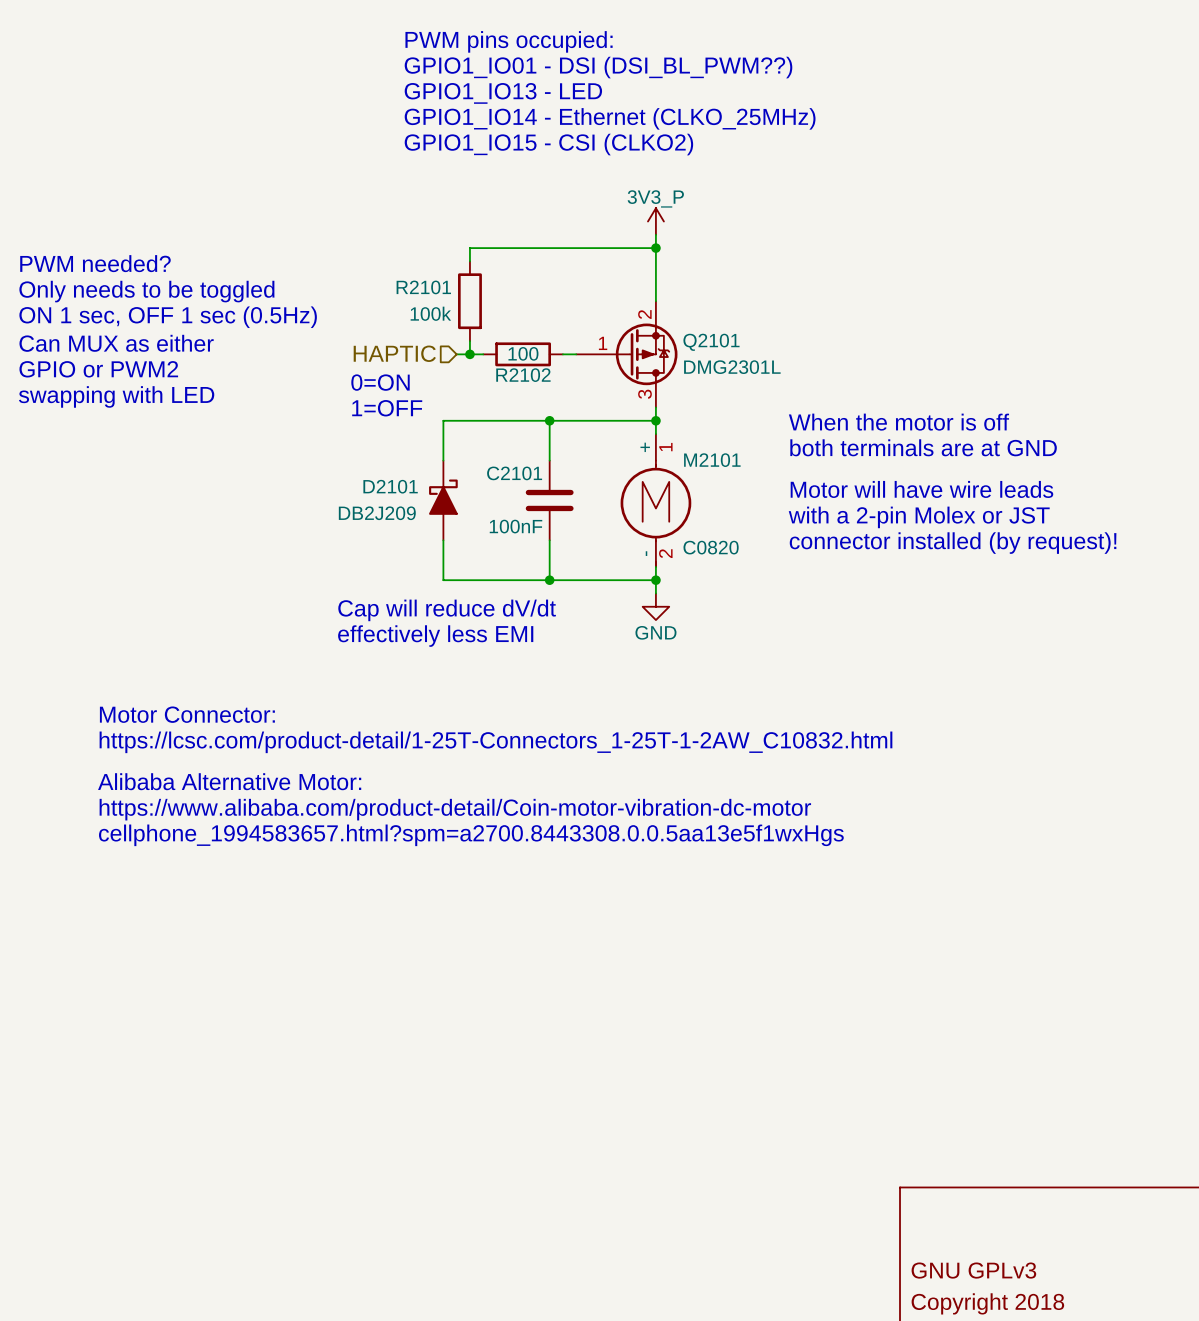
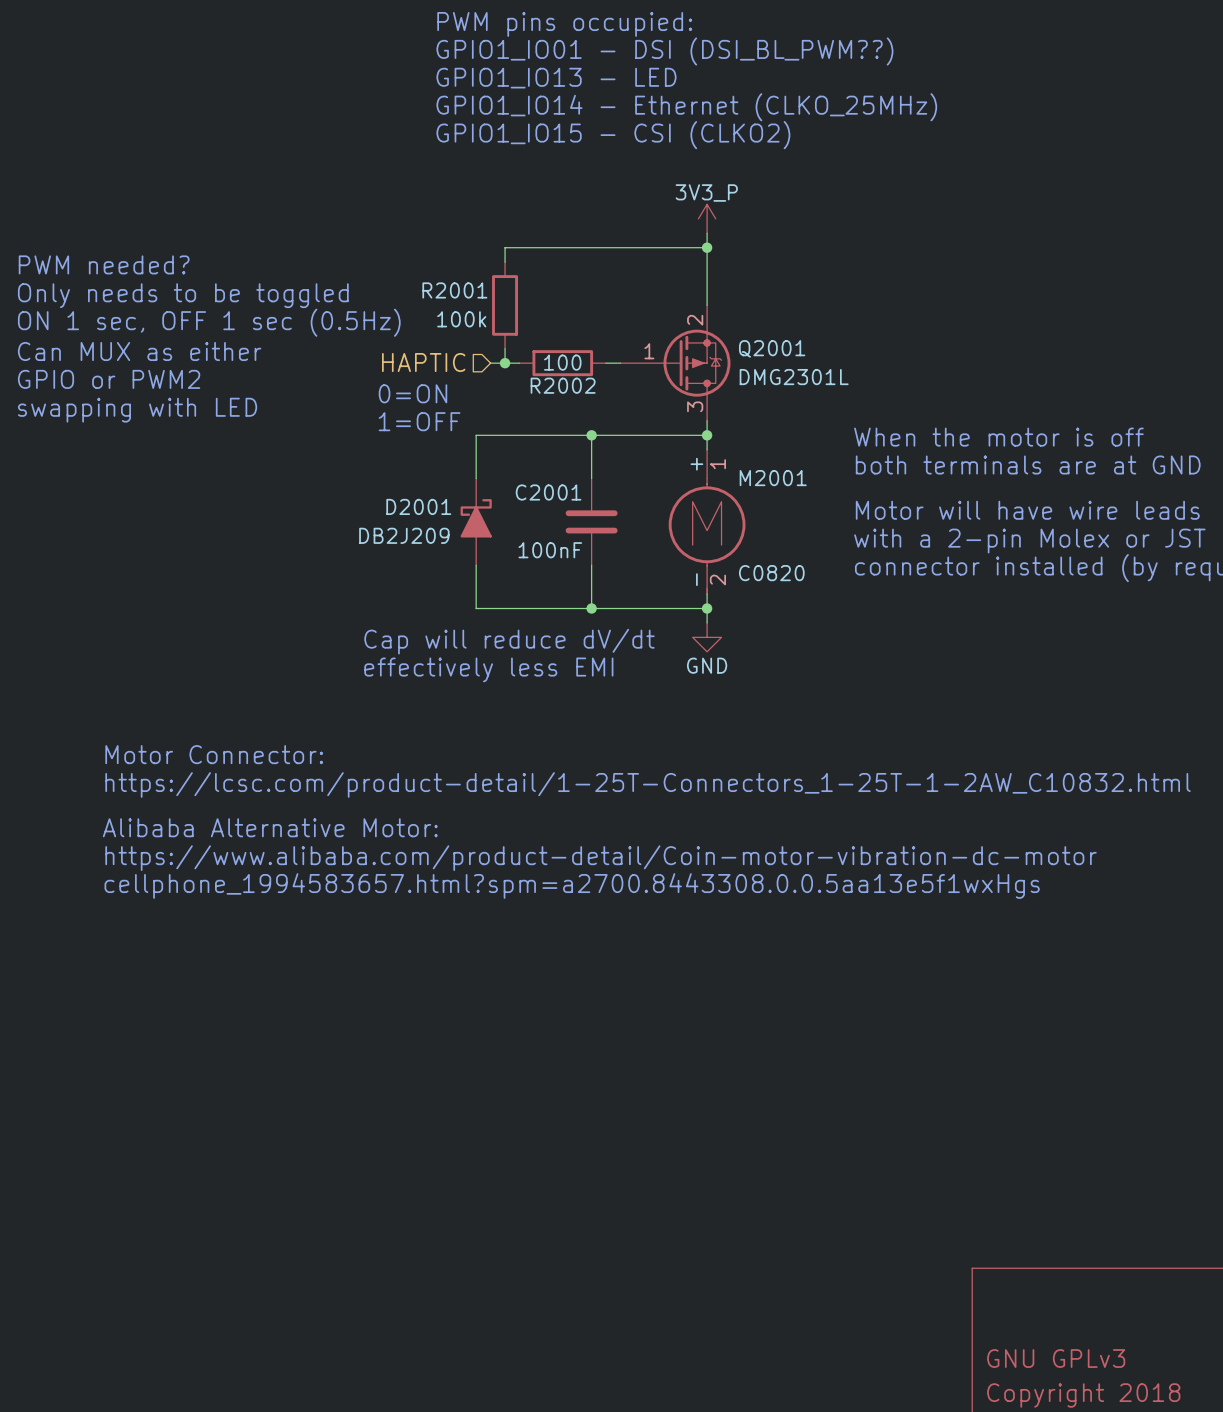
R2101 name: R2101 (423, 287) -> R2001 (454, 290)
Q2101 name: Q2101 (711, 342) -> Q2001 (772, 348)
R2102 name: R2102 (523, 375) -> R2002 (563, 385)
M2101 name: M2101 (712, 460) -> M2001 (773, 478)
C2101 name: C2101 (514, 473) -> C2001 (548, 492)
D2101 name: D2101 (390, 486) -> D2001 (418, 506)

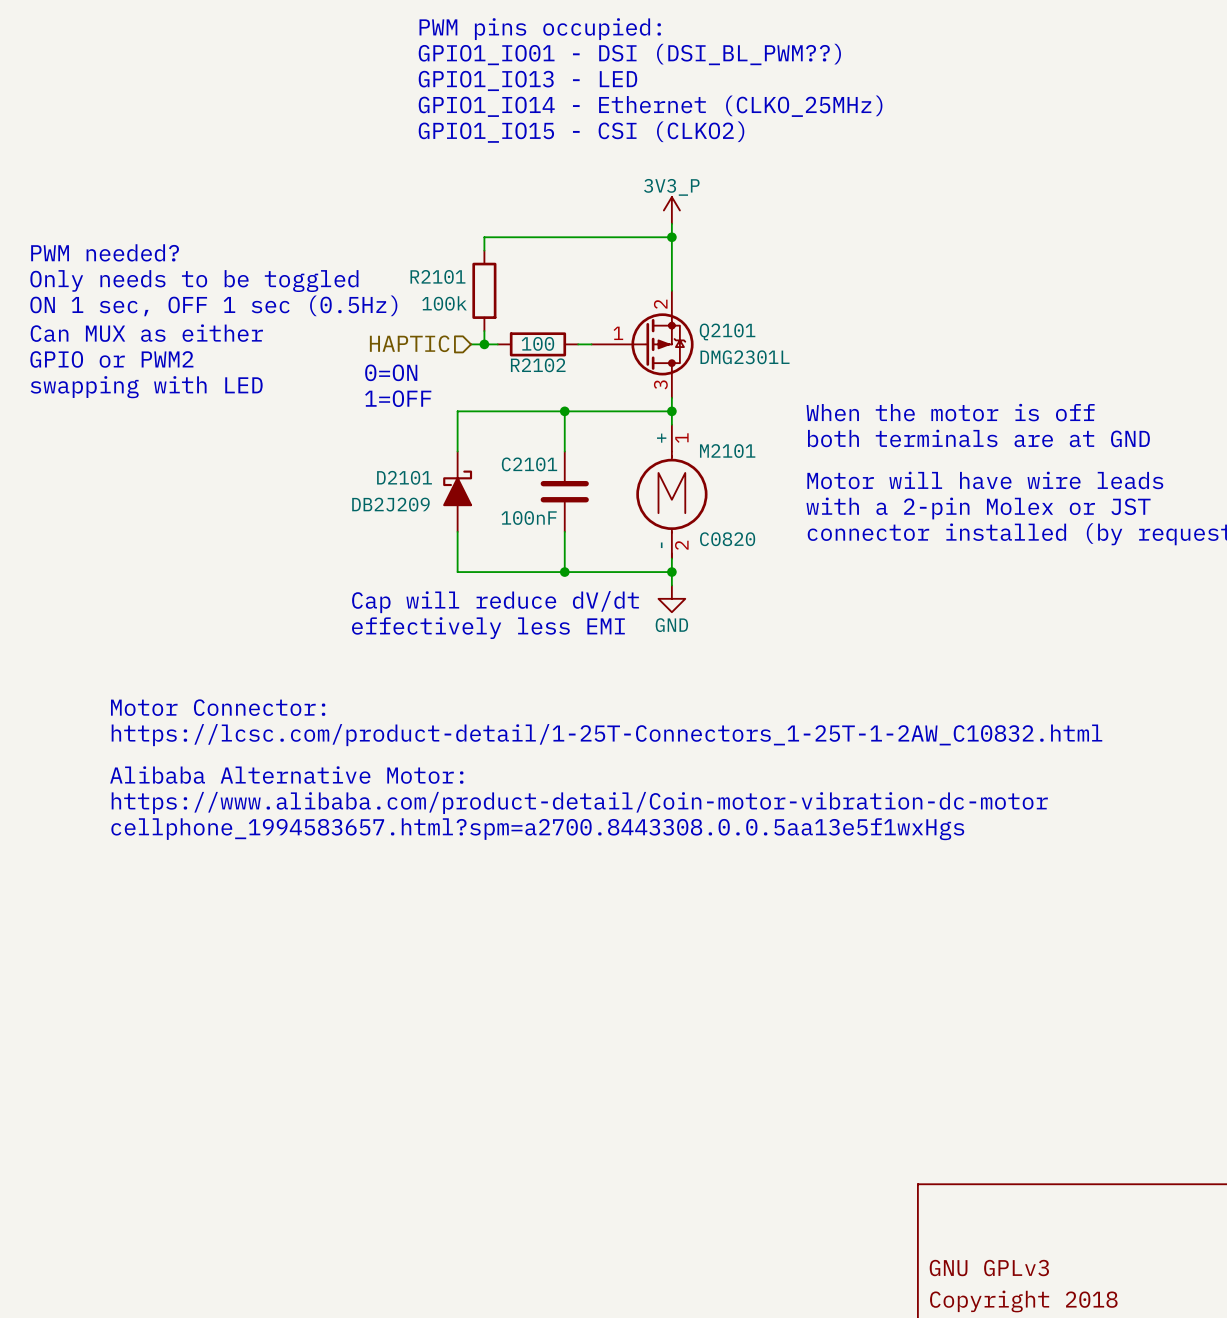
R2001 name: R2001 (454, 290) -> R2101 (437, 276)
Q2001 name: Q2001 (772, 348) -> Q2101 (727, 331)
R2002 name: R2002 (563, 385) -> R2102 (538, 365)
M2001 name: M2001 (773, 478) -> M2101 (727, 451)
C2001 name: C2001 (548, 492) -> C2101 (529, 464)
D2001 name: D2001 (418, 506) -> D2101 (404, 477)

